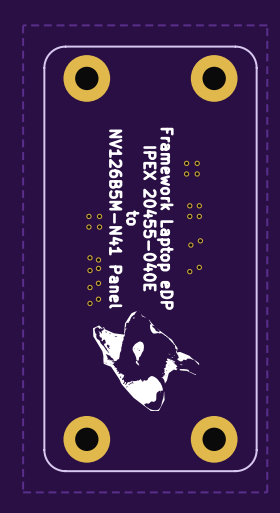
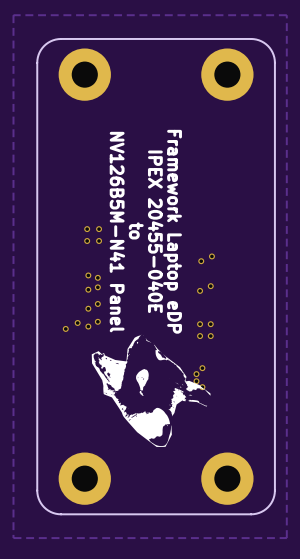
via: (186, 163) -> none
via: (197, 163) -> none
via: (186, 173) -> none
via: (197, 173) -> none
via: (189, 205) -> none
via: (199, 205) -> none
via: (189, 216) -> none
via: (199, 216) -> none
via: none -> (77, 322)
via: none -> (200, 324)
via: none -> (210, 324)
via: none -> (65, 328)
via: none -> (200, 336)
via: none -> (210, 336)
via: none -> (202, 368)
via: none -> (196, 374)
via: none -> (196, 381)
via: none -> (202, 387)

